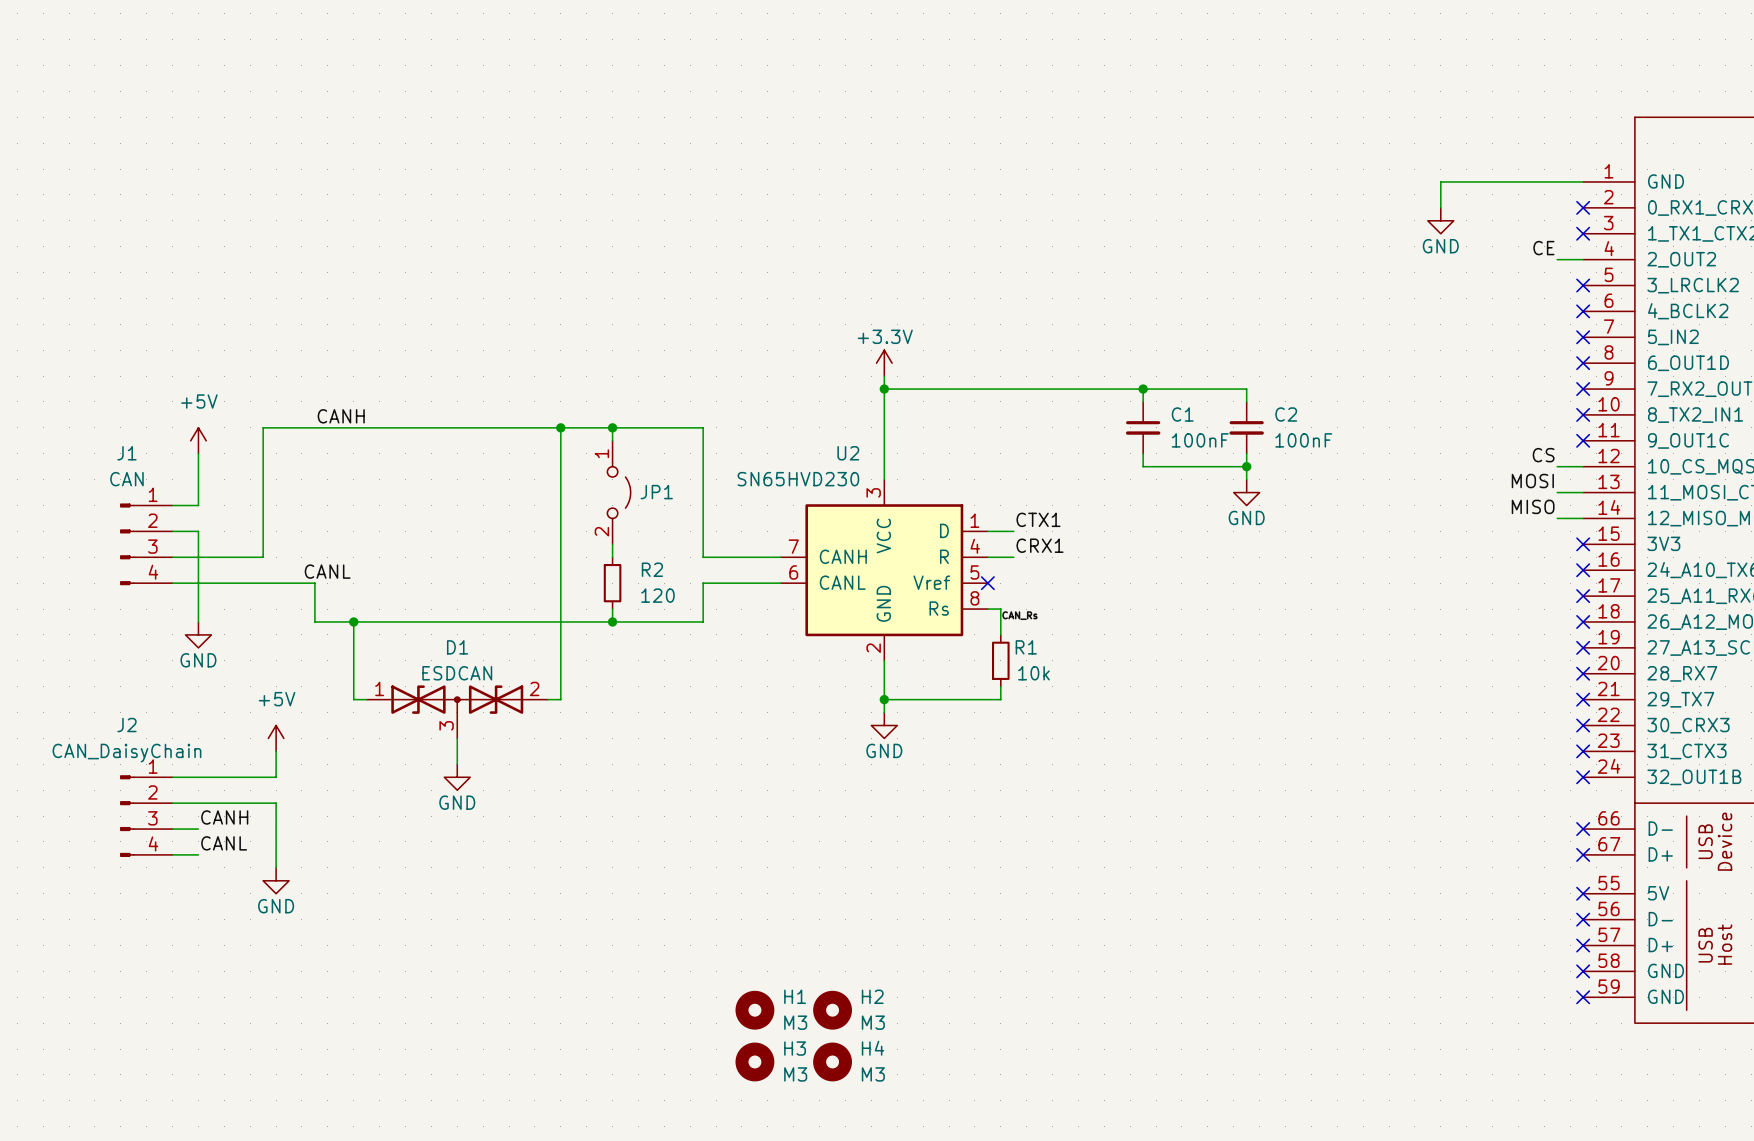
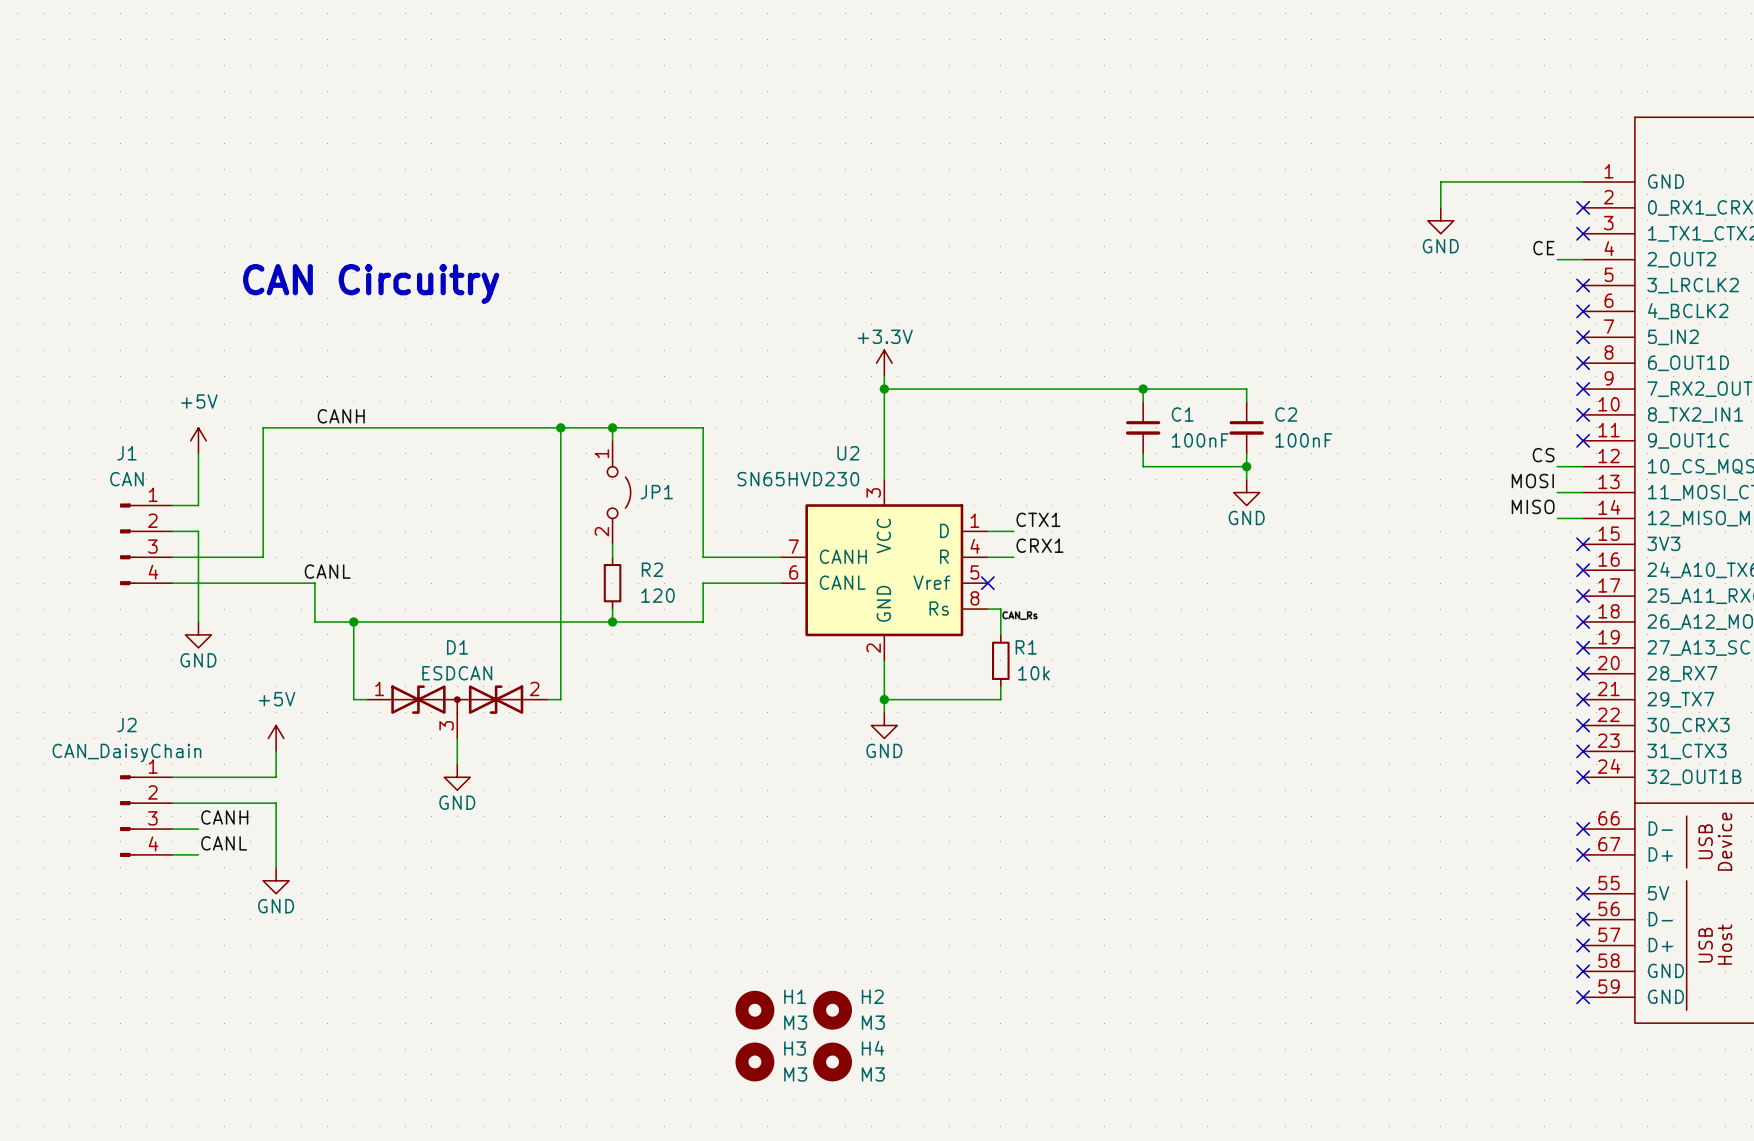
text: none -> CAN Circuitry (371, 284)

